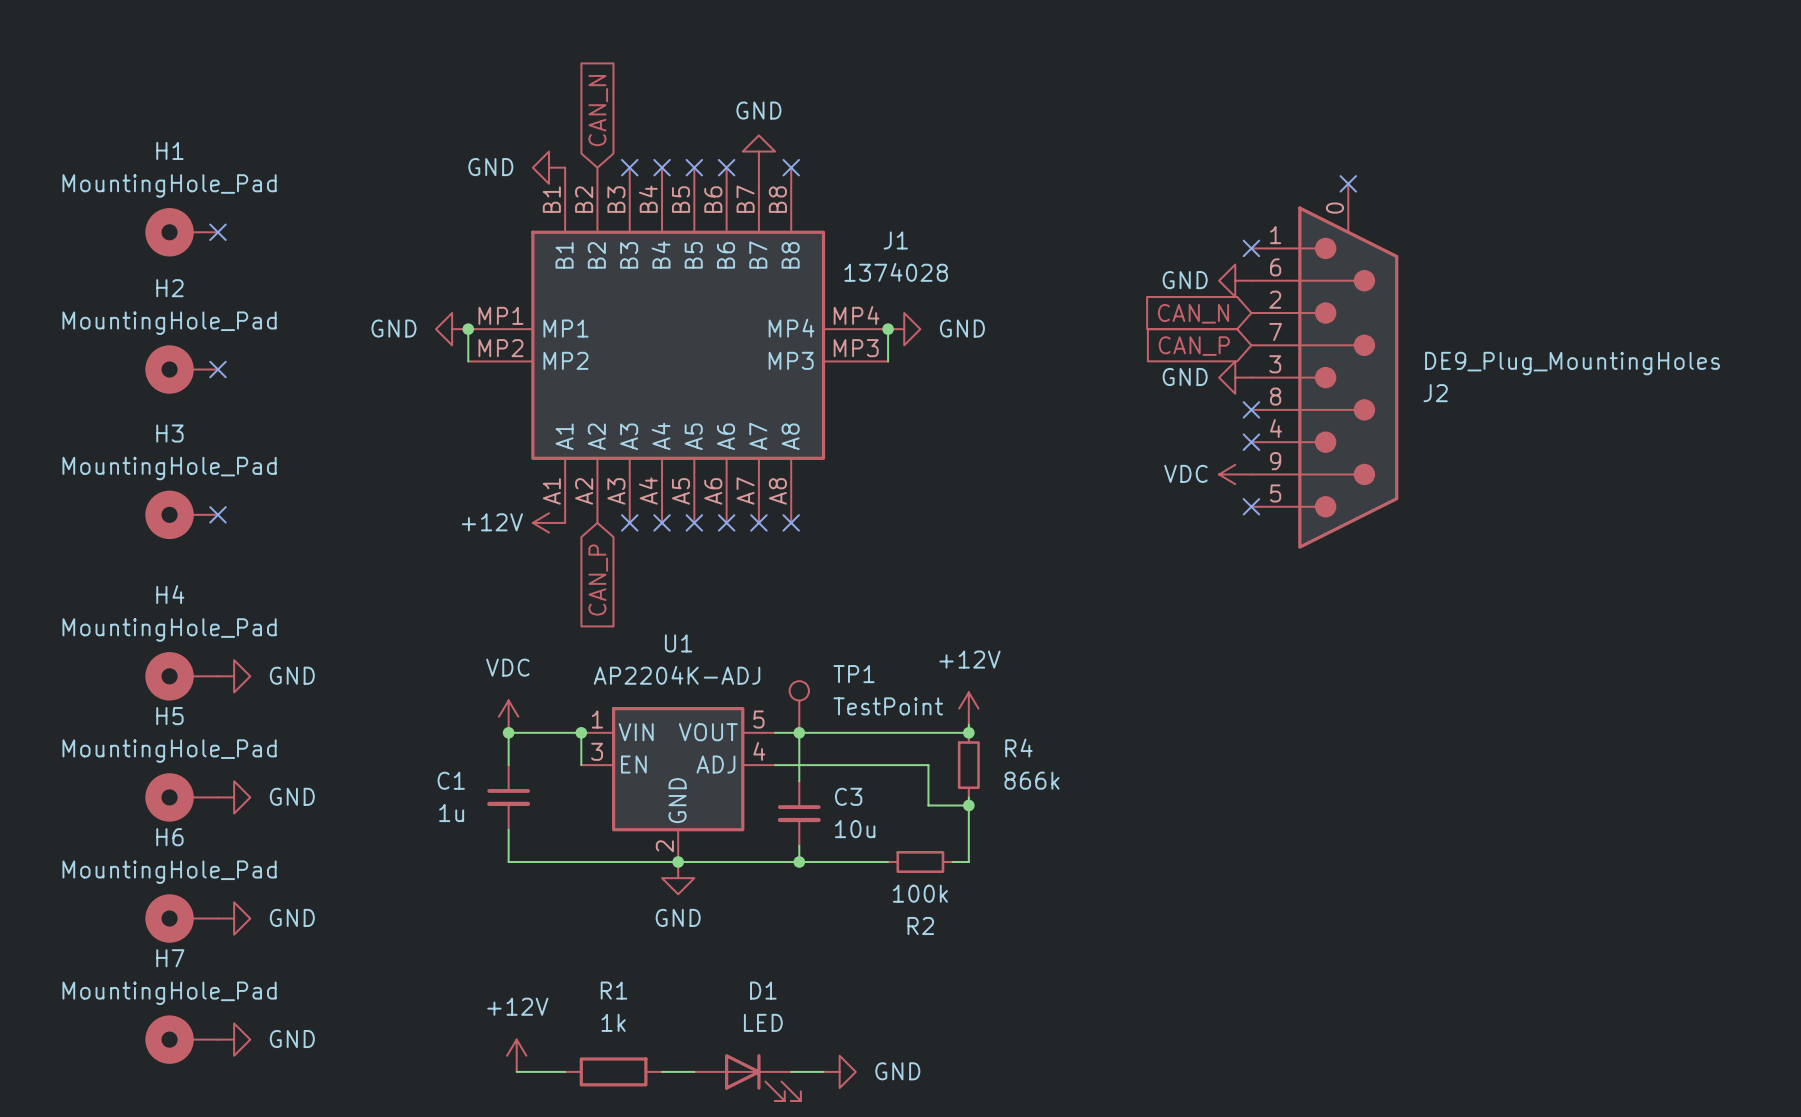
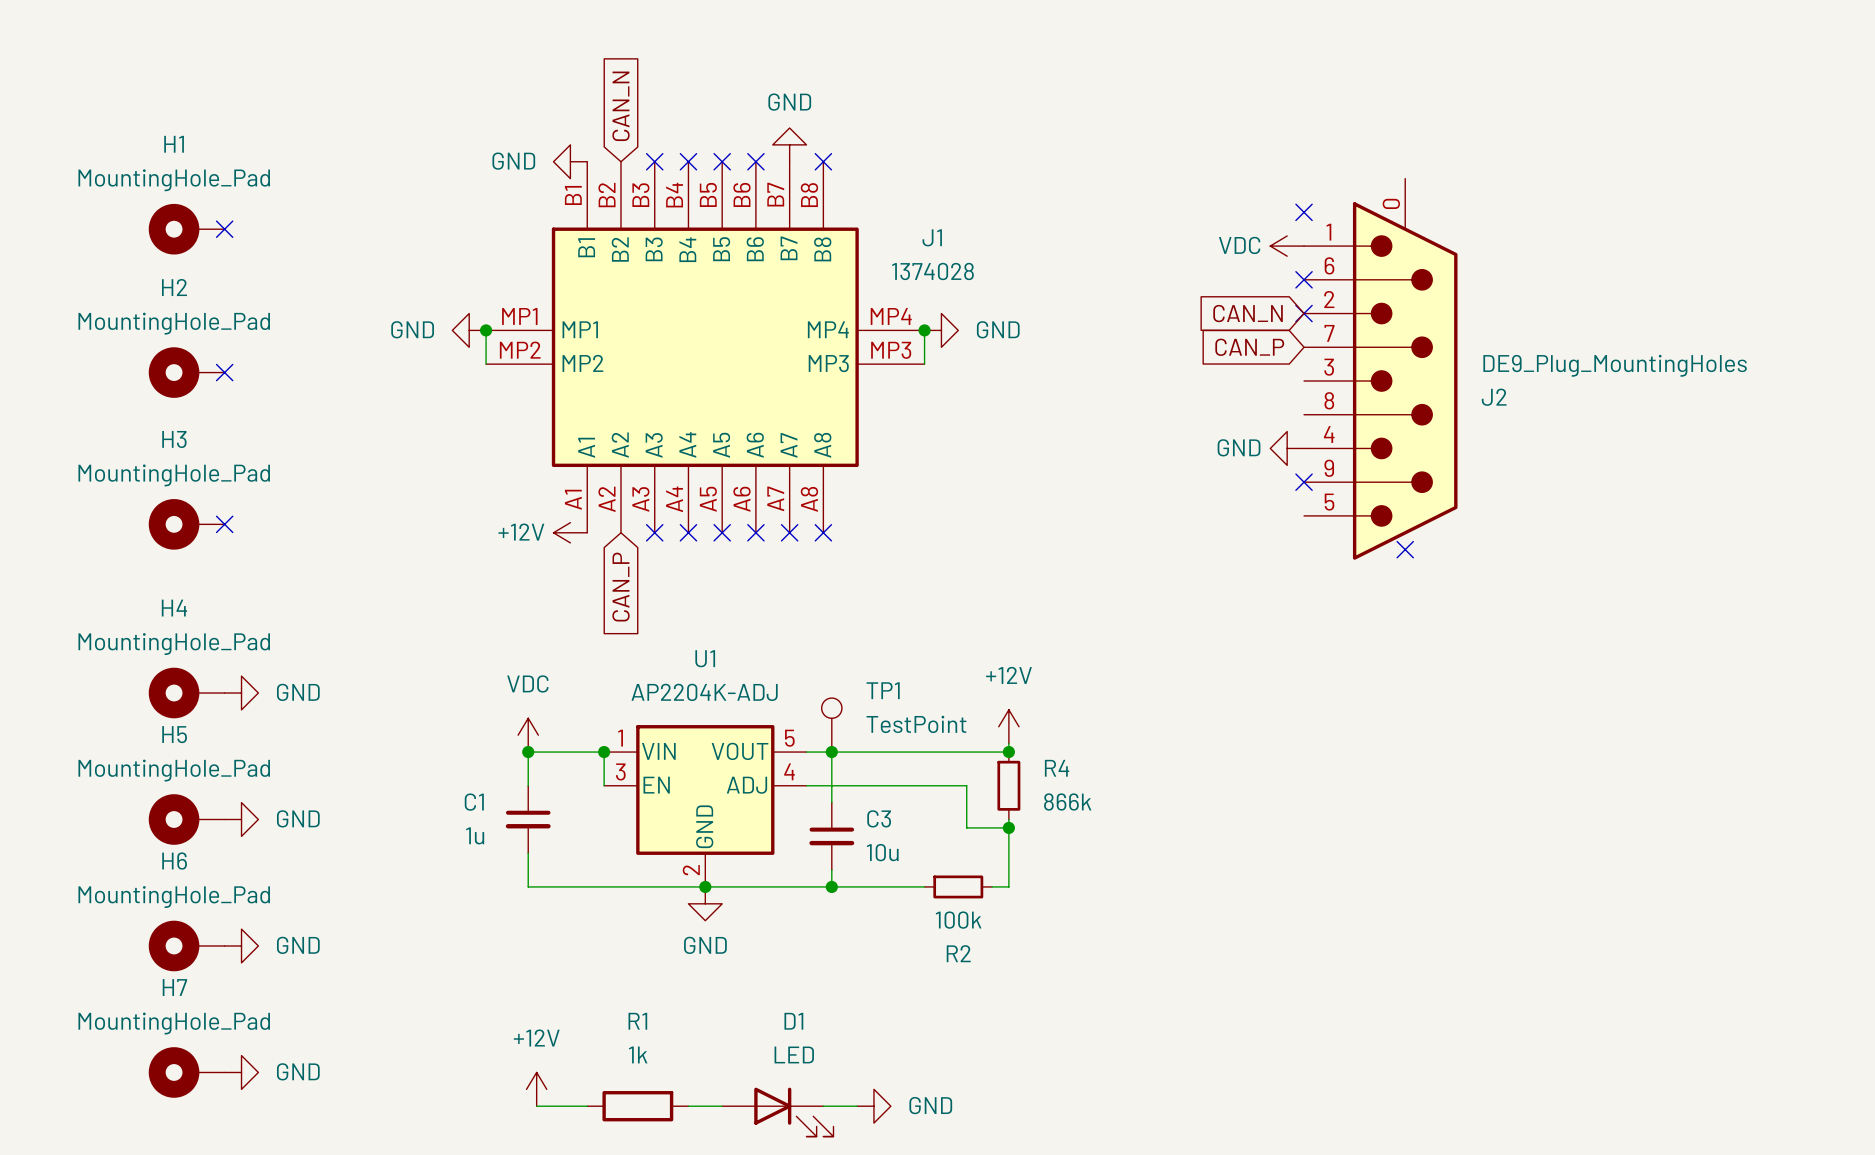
no-connect mark: (1348, 183) -> none
no-connect mark: none -> (1304, 212)
no-connect mark: (1251, 248) -> none
power symbol: GND (1235, 280) -> none
no-connect mark: none -> (1304, 279)
no-connect mark: none -> (1304, 313)
power symbol position: GND (1235, 377) -> GND (1287, 448)
no-connect mark: (1251, 409) -> none
no-connect mark: (1251, 442) -> none
power symbol position: VDC (1235, 474) -> VDC (1287, 246)
no-connect mark: none -> (1304, 482)
no-connect mark: (1251, 506) -> none
no-connect mark: none -> (1405, 549)

